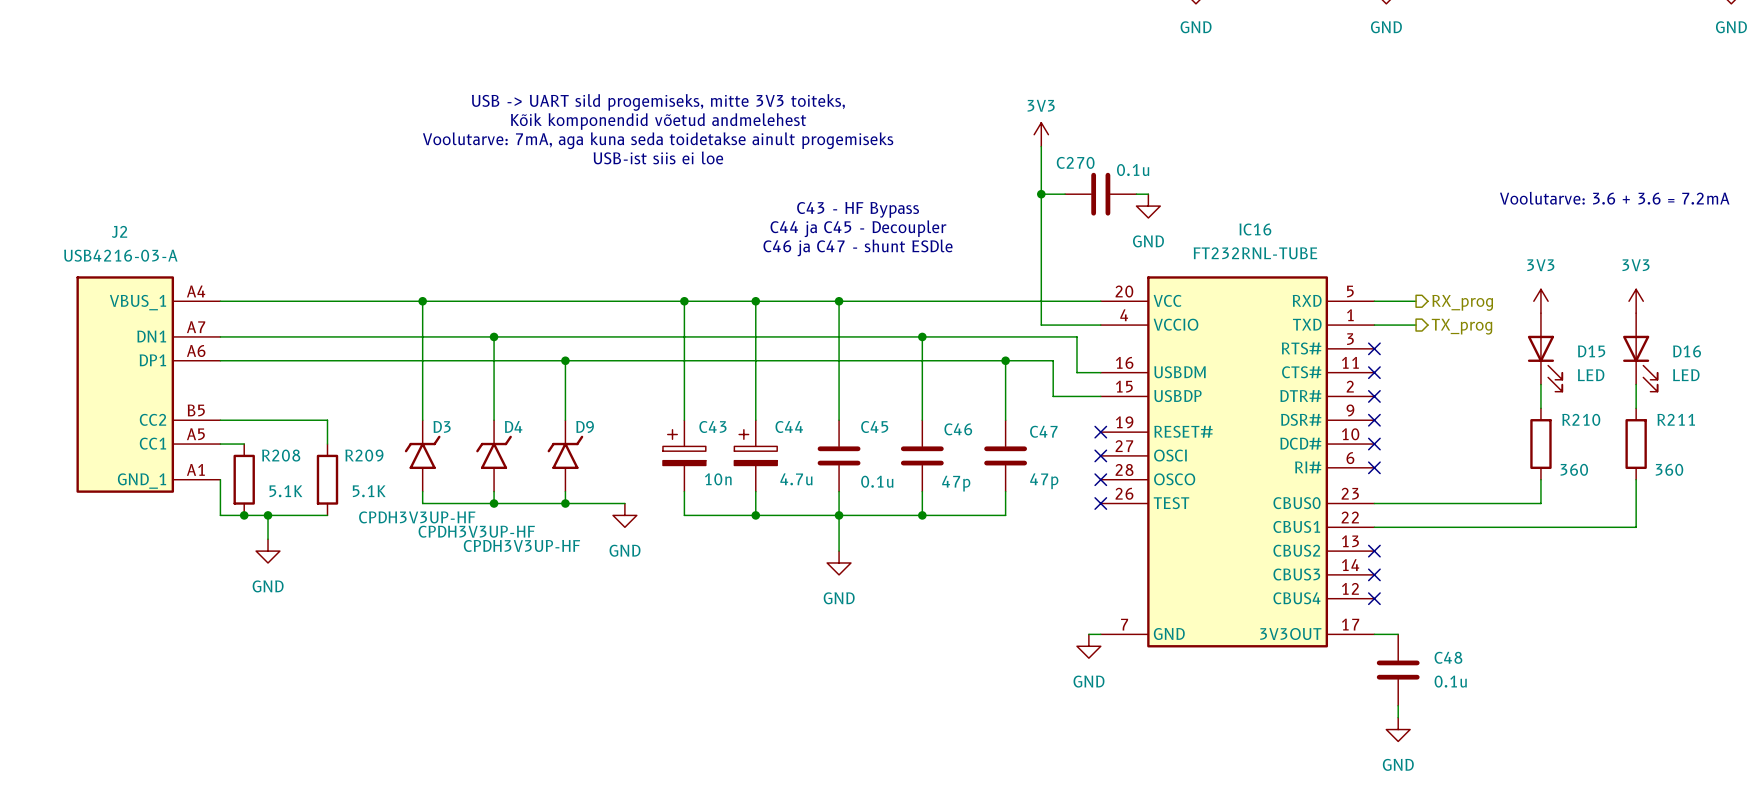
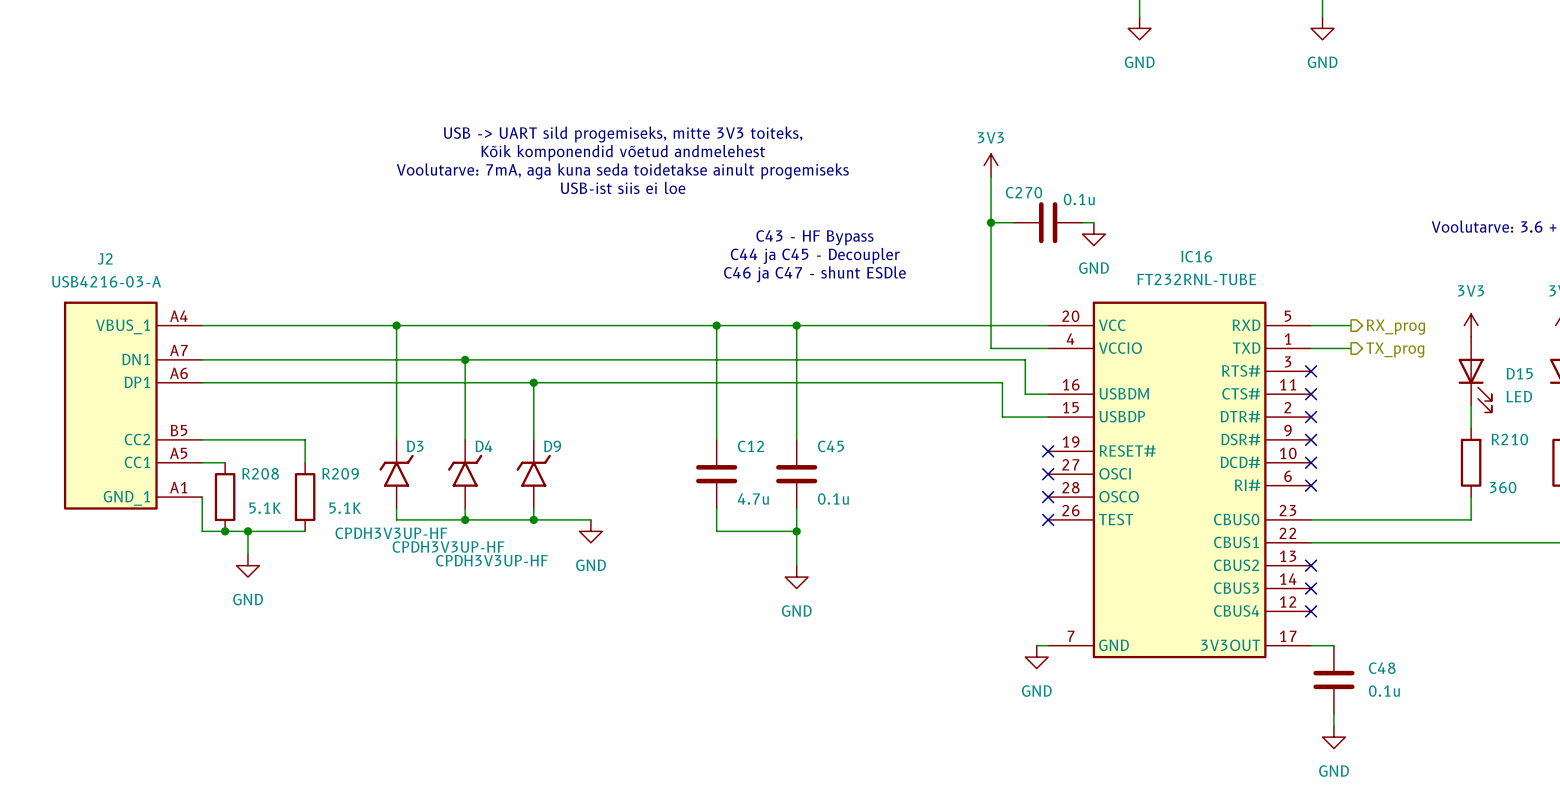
wire: (684, 301) (684, 420) -> none
junction: (684, 301) -> none
wire: (922, 336) (922, 420) -> none
junction: (922, 336) -> none
wire: (1005, 360) (1005, 420) -> none
junction: (1005, 360) -> none
C43: 10n (684, 455) -> none
C44: 4.7u (755, 455) -> none
C12: none -> 4.7u (716, 474)
C46: 47p (922, 455) -> none
C47: 47p (1005, 455) -> none
wire: (684, 491) (684, 515) (755, 515) -> none
wire: (922, 491) (922, 515) -> none
wire: (1005, 491) (1005, 515) (839, 515) -> none
junction: (755, 515) -> none
junction: (922, 515) -> none

